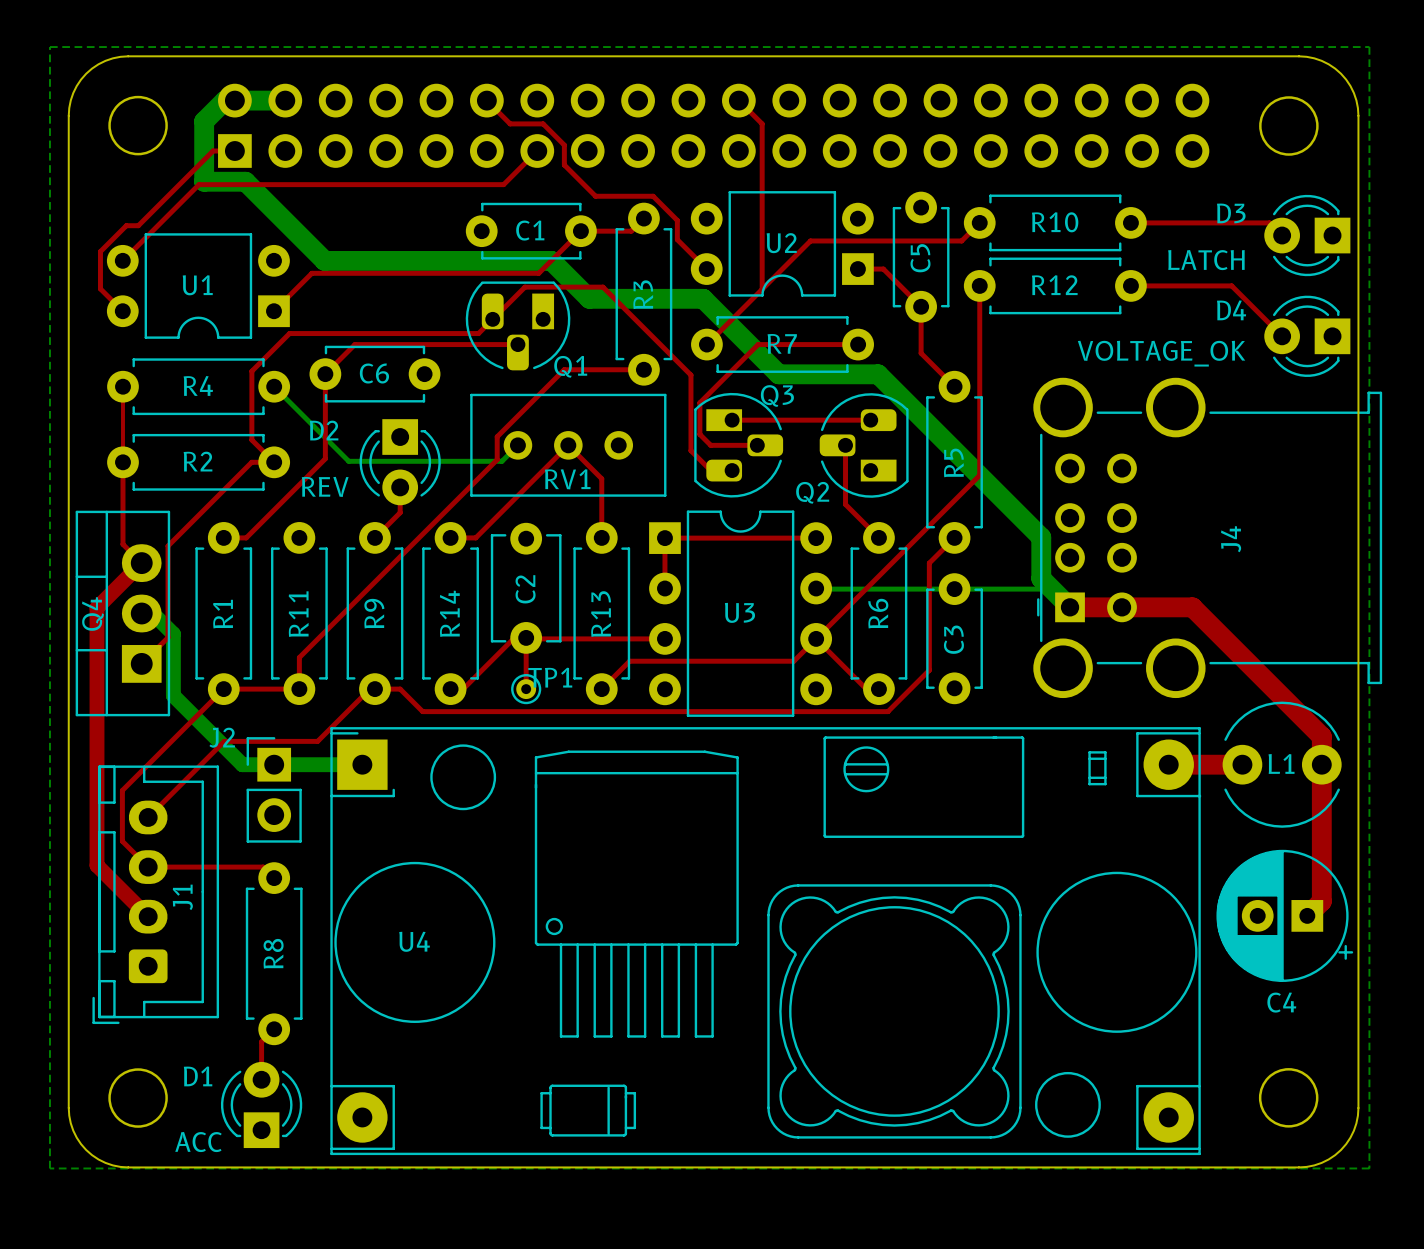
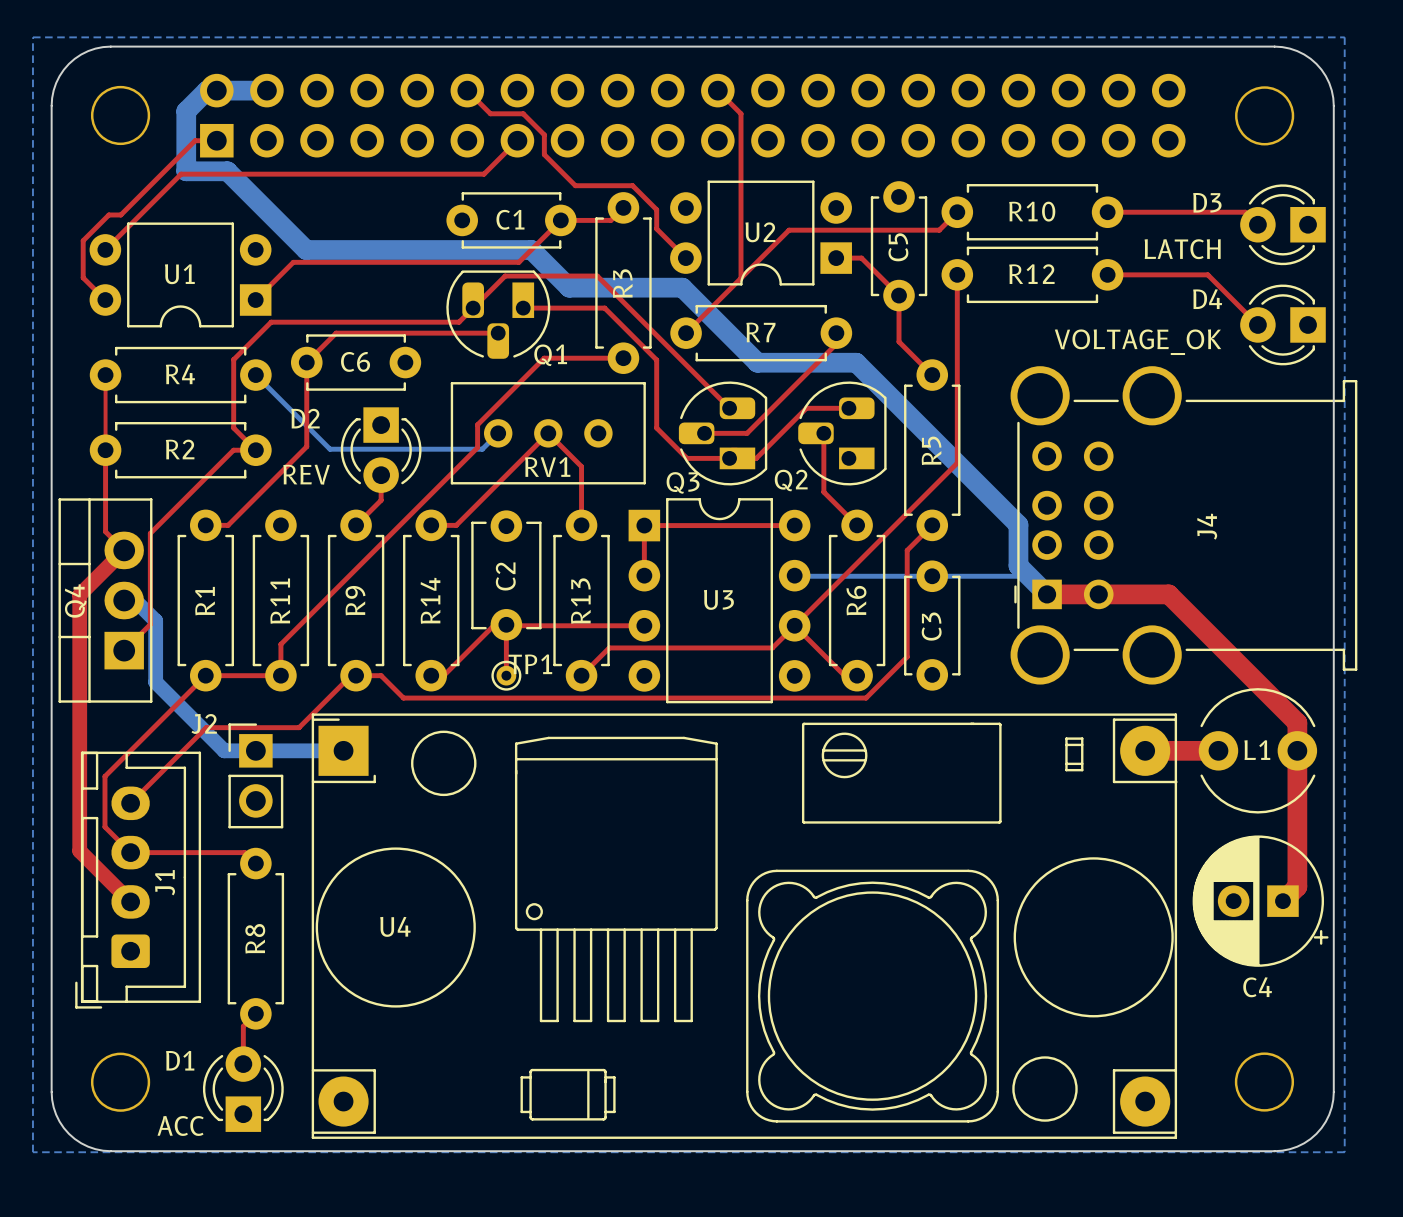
top track: (602, 287) (690, 375) (690, 450) (710, 470) -> (582, 276) (597, 276) (729, 408)
top track: none -> (523, 308) (604, 308) (656, 360) (656, 428) (687, 458) (689, 458)
top track: (858, 344) (758, 344) (699, 402) (699, 434) (710, 445) (725, 445) -> (836, 333) (836, 344) (747, 433) (736, 433)
top track: (732, 420) (827, 420) -> (711, 458) (756, 458) (806, 408)
Q3 rotation: 0° (738, 445) -> 180° (723, 433)

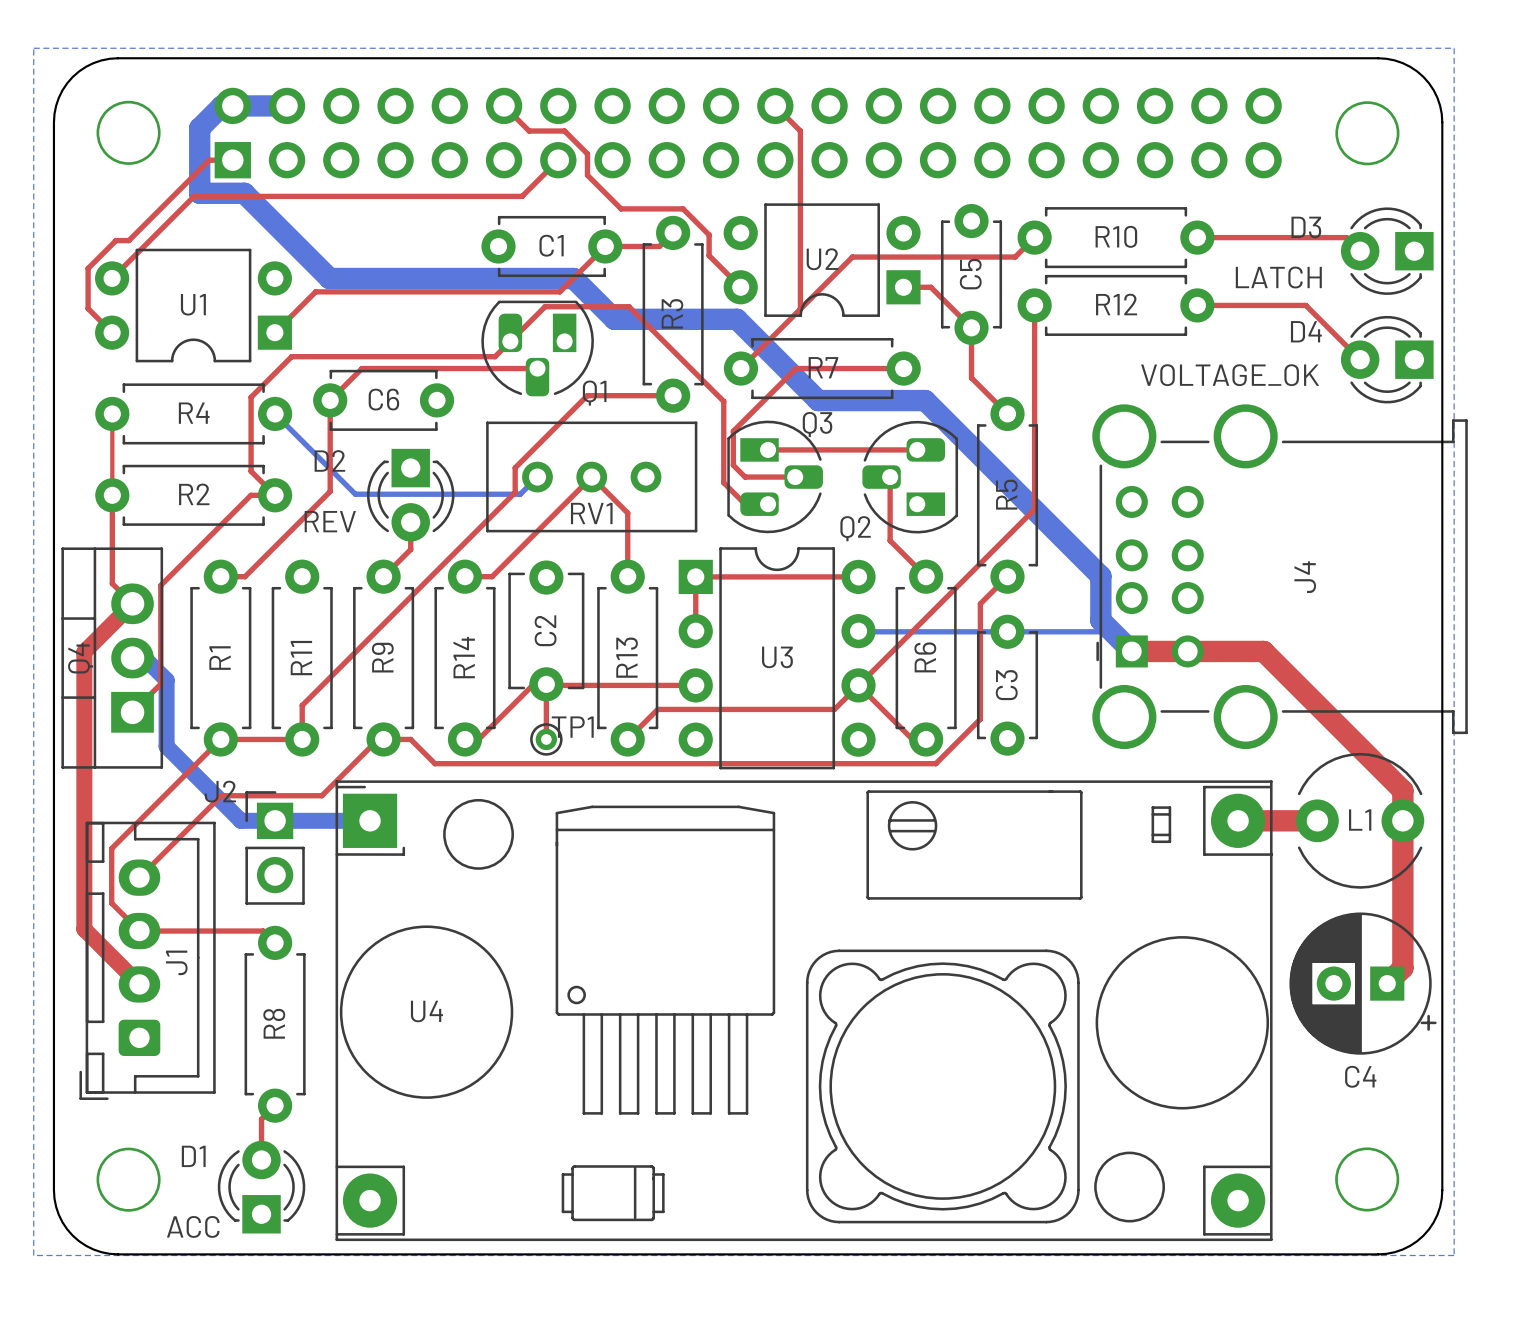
top track: (582, 276) (597, 276) (729, 408) -> (629, 306) (723, 401) (723, 482) (745, 504)
top track: (523, 308) (604, 308) (656, 360) (656, 428) (687, 458) (689, 458) -> none
top track: (836, 333) (836, 344) (747, 433) (736, 433) -> (903, 368) (796, 368) (733, 431) (733, 465) (745, 477) (760, 477)
top track: (806, 408) (756, 458) (711, 458) -> (871, 449) (768, 449)
Q3 rotation: 0° (723, 433) -> 180° (775, 476)

